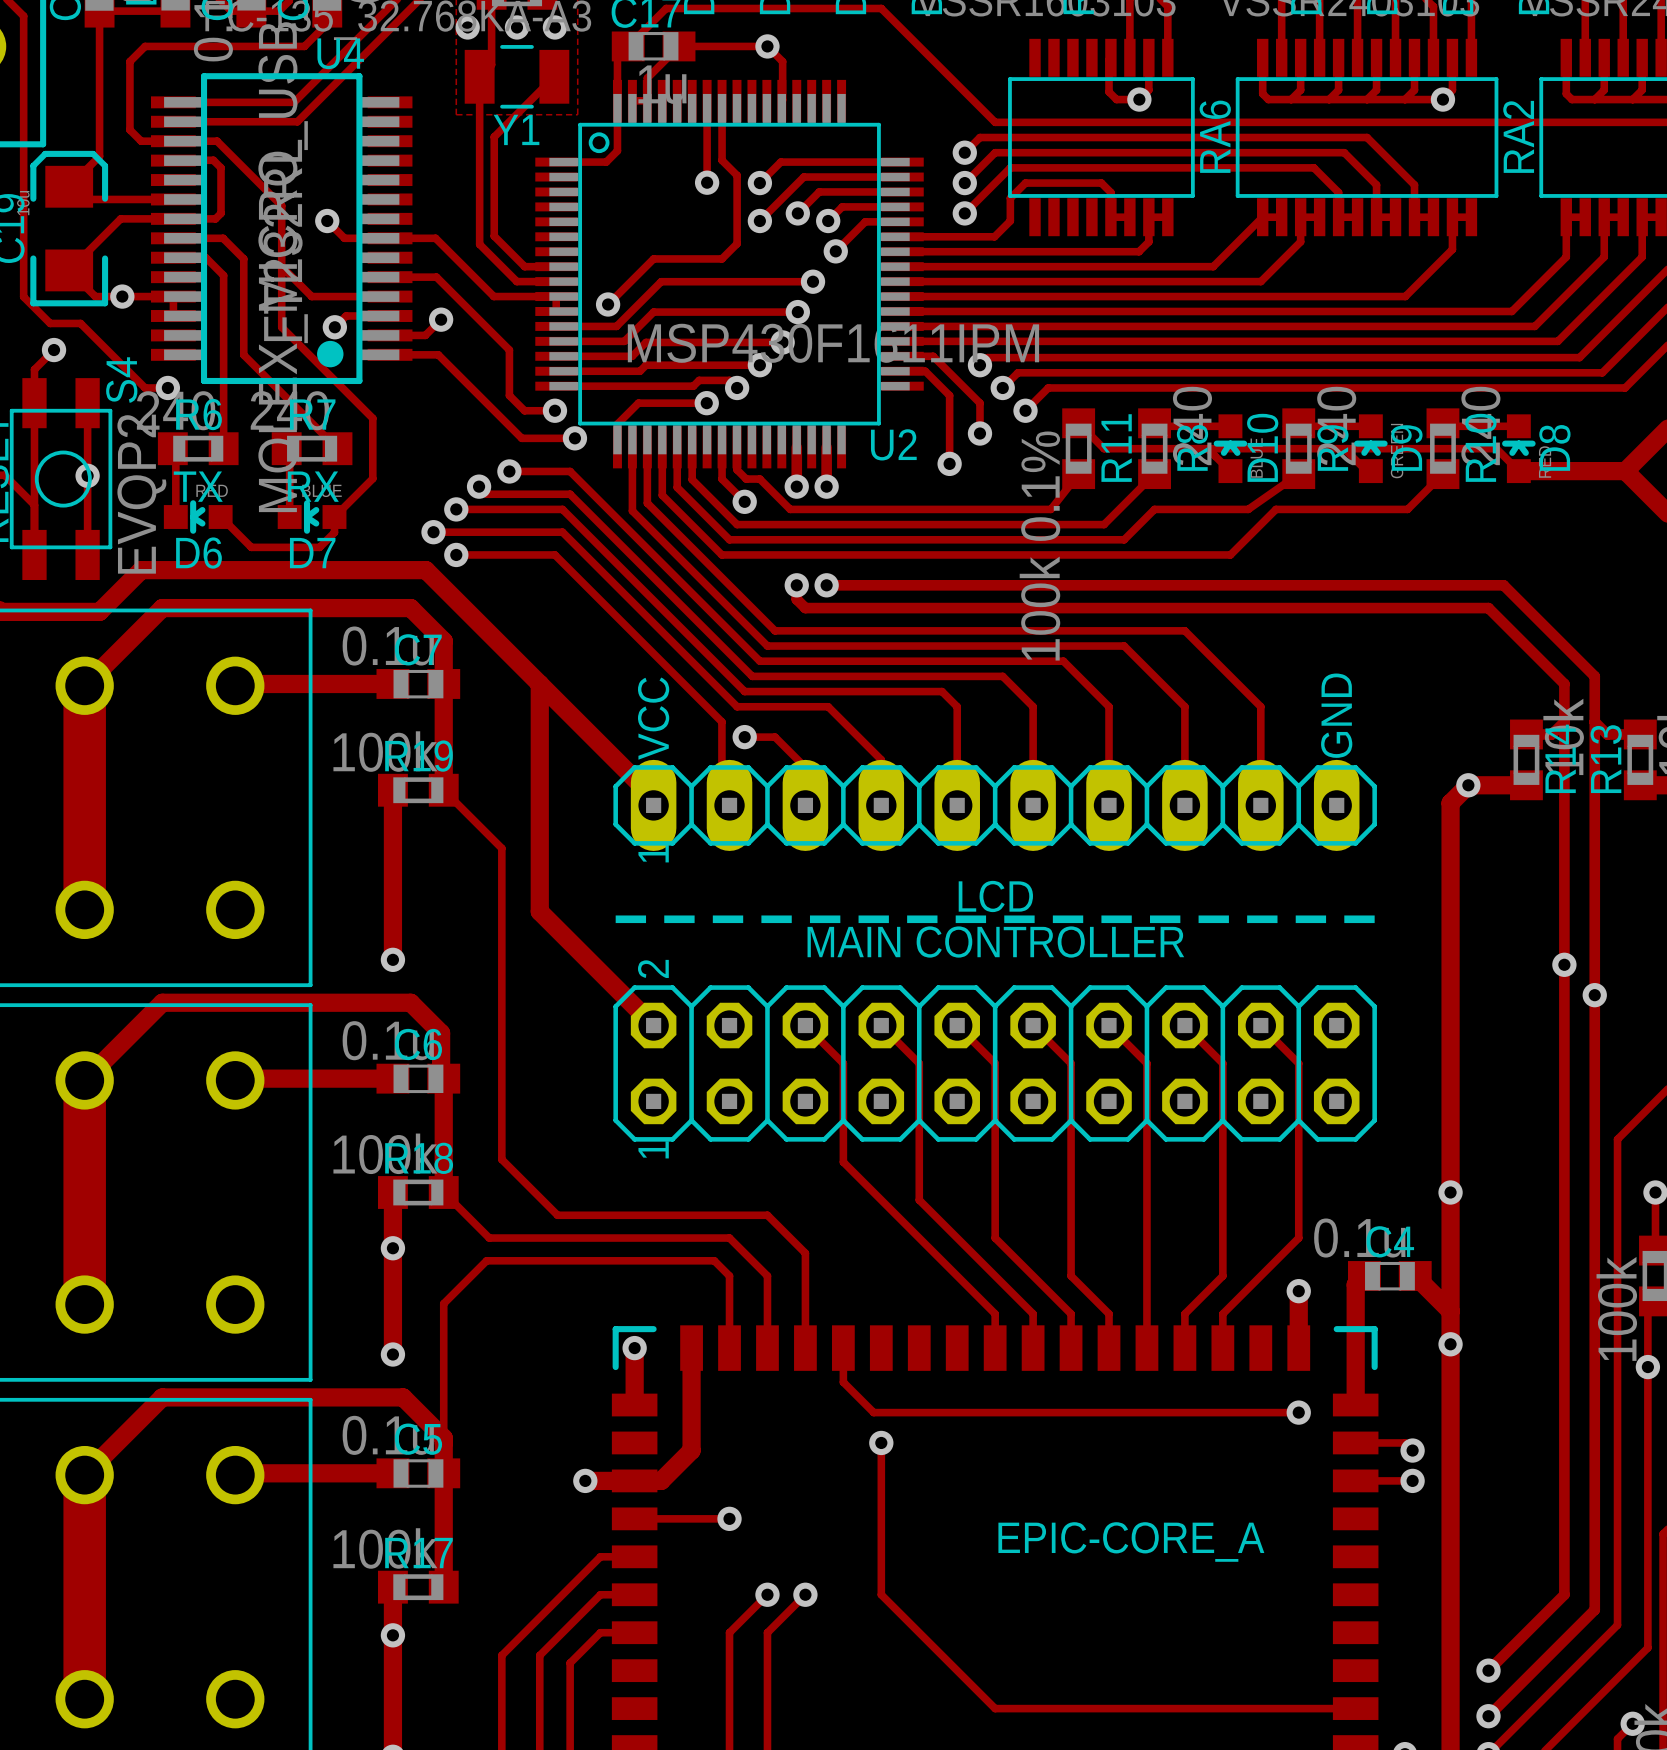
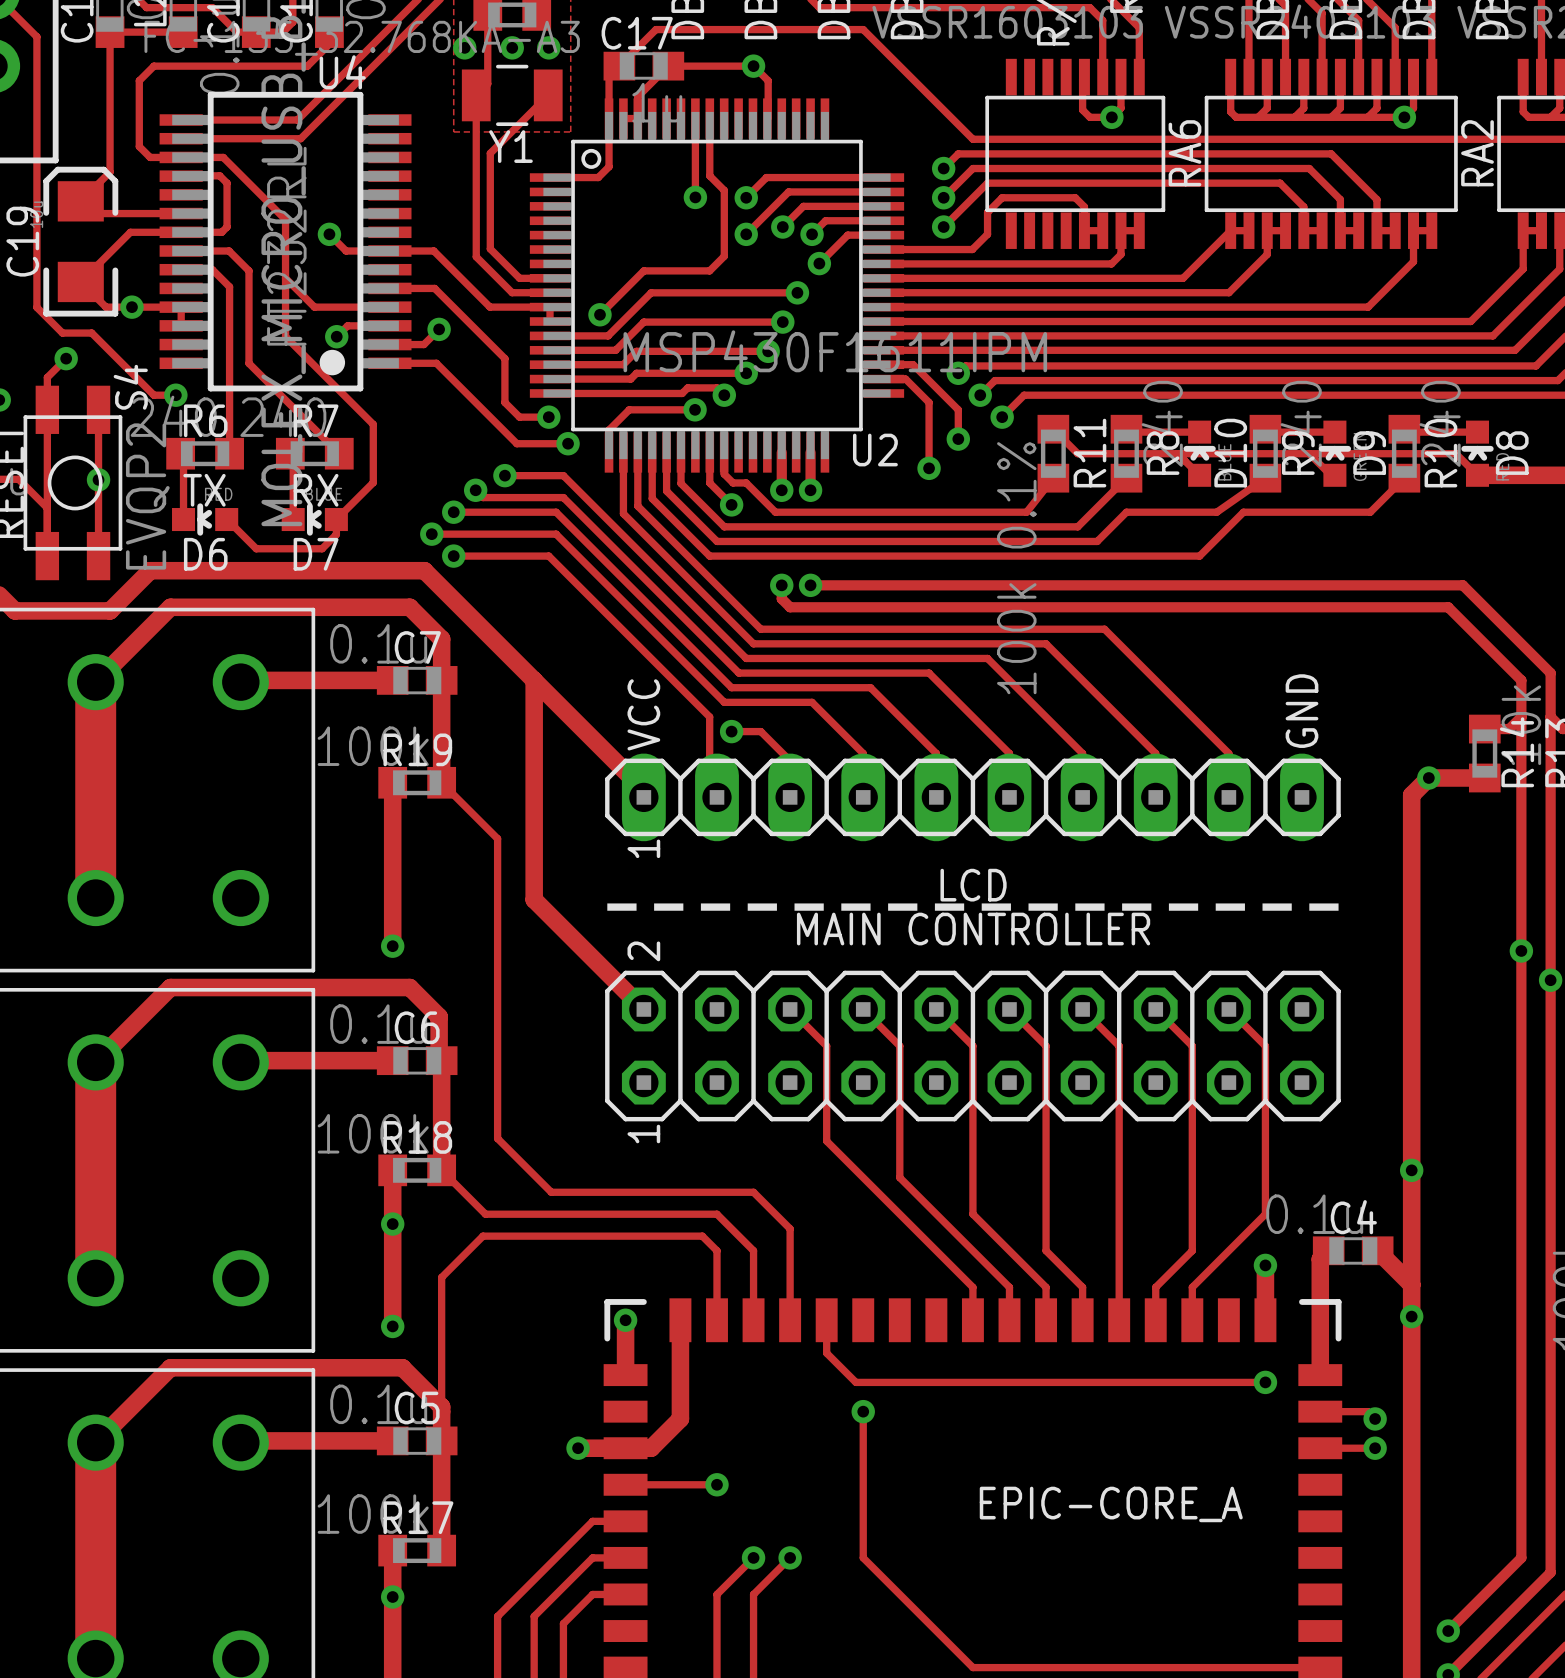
track: (1131, 630) (1184, 630) (1260, 706) (1260, 759) -> (1104, 629) (1228, 753)
track: (1071, 646) (1124, 646) (1184, 706) (1184, 759) -> (1046, 643) (1155, 753)
track: (1010, 661) (1063, 661) (1109, 706) (1109, 759) -> (987, 658) (1082, 753)
track: (949, 676) (1002, 676) (1033, 706) (1033, 759) -> (929, 673) (1009, 753)
track: (888, 691) (942, 691) (957, 706) (957, 759) -> (870, 687) (936, 753)

